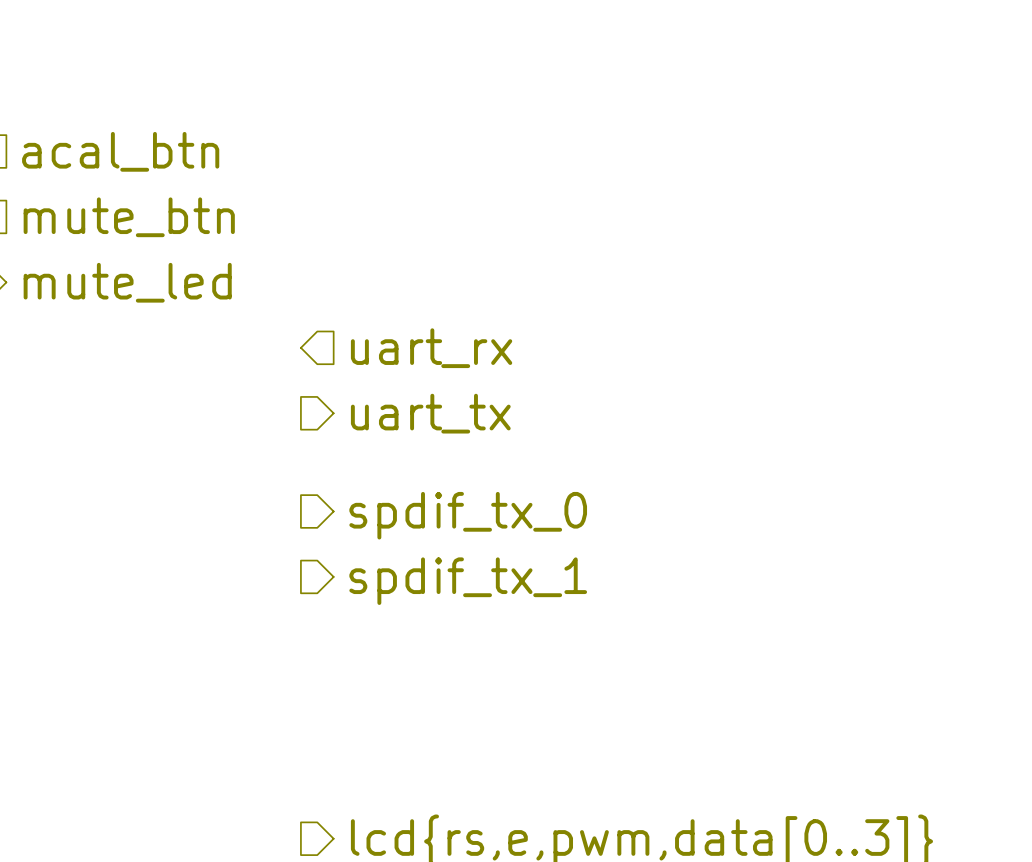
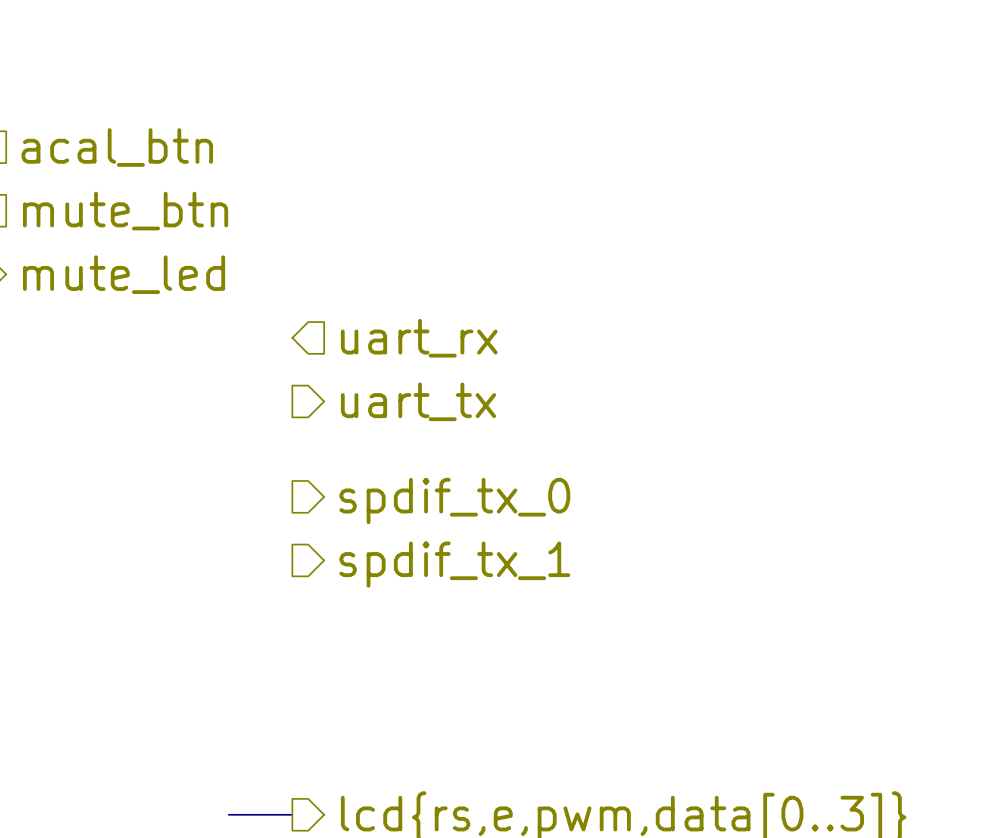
bus: none -> (228, 814) (292, 814)

